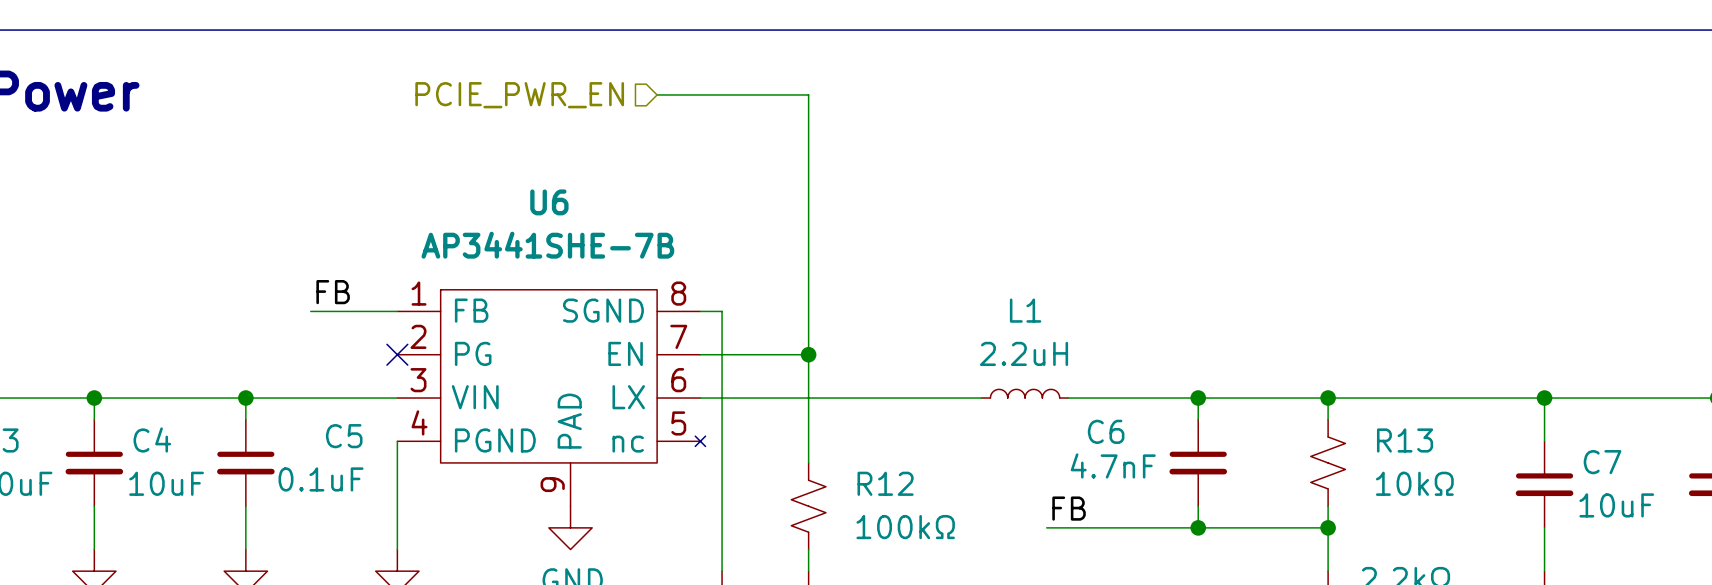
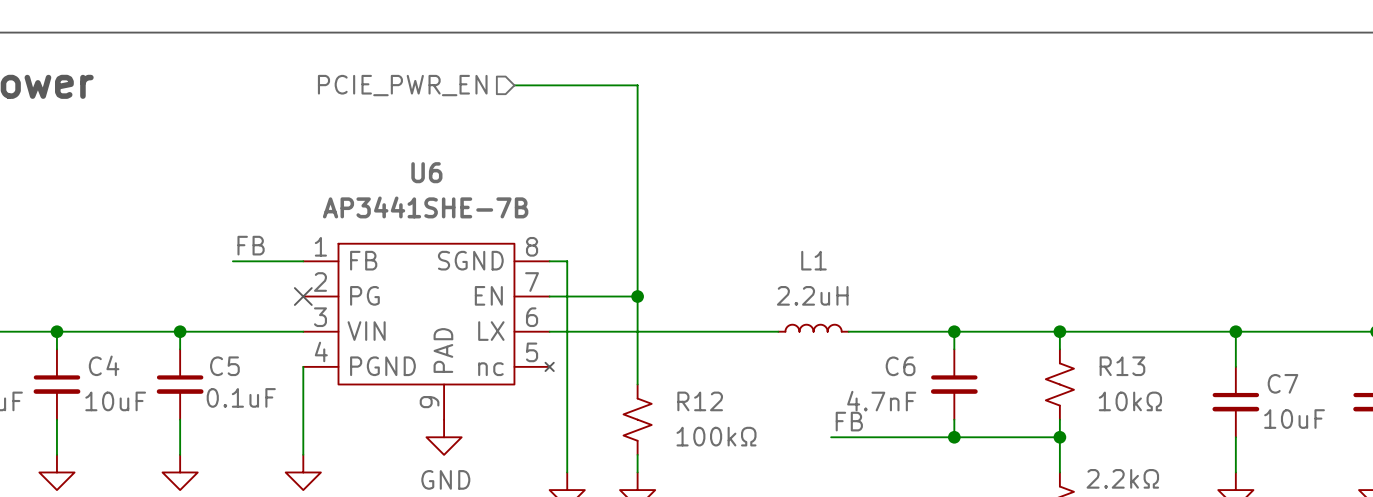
C6 name position: C6 (1106, 431) -> C6 (900, 366)
C5 name position: C5 (344, 436) -> C5 (224, 366)
C6 value position: 4.7nF (1113, 465) -> 4.7nF (881, 401)

